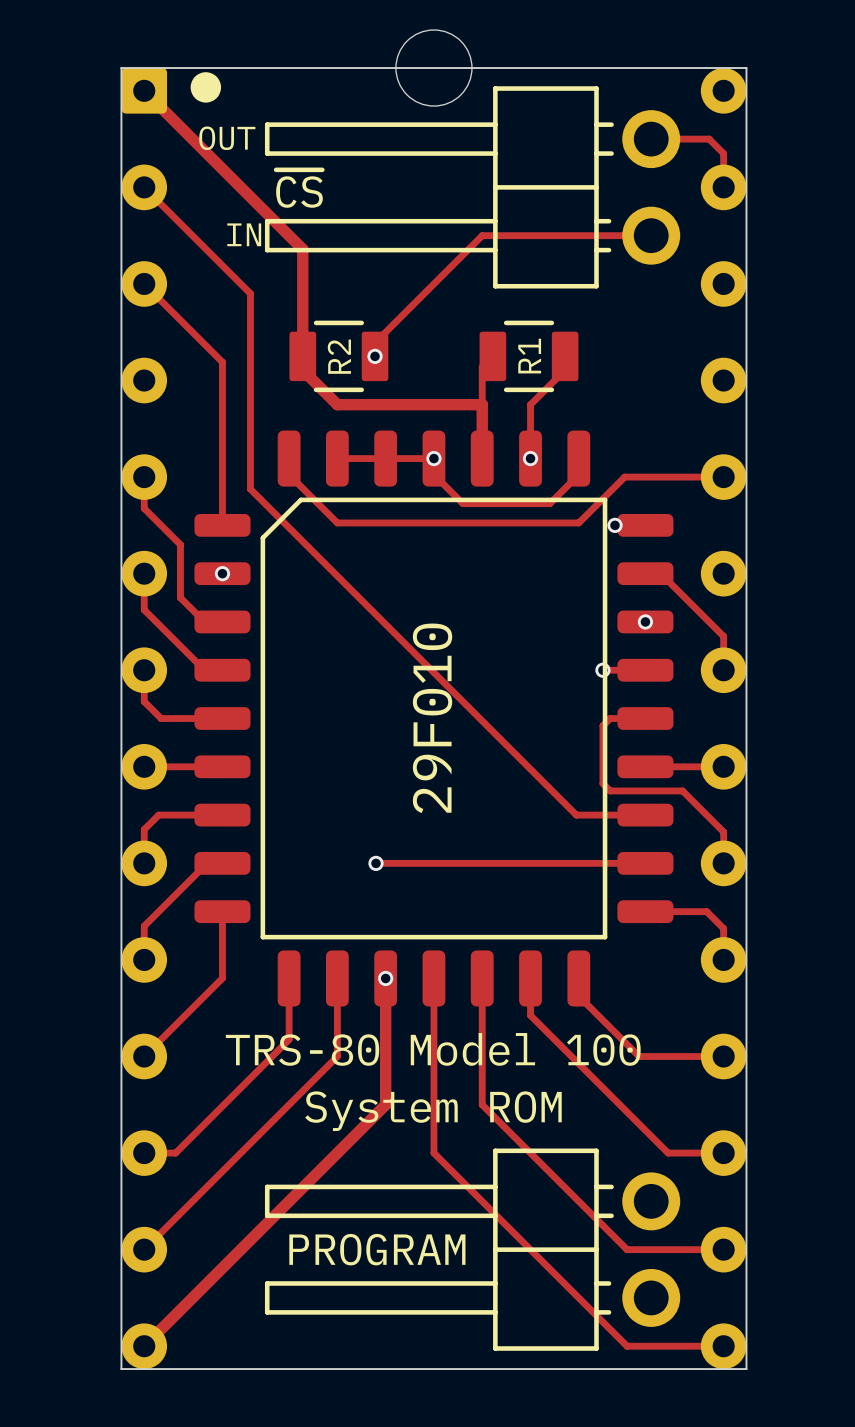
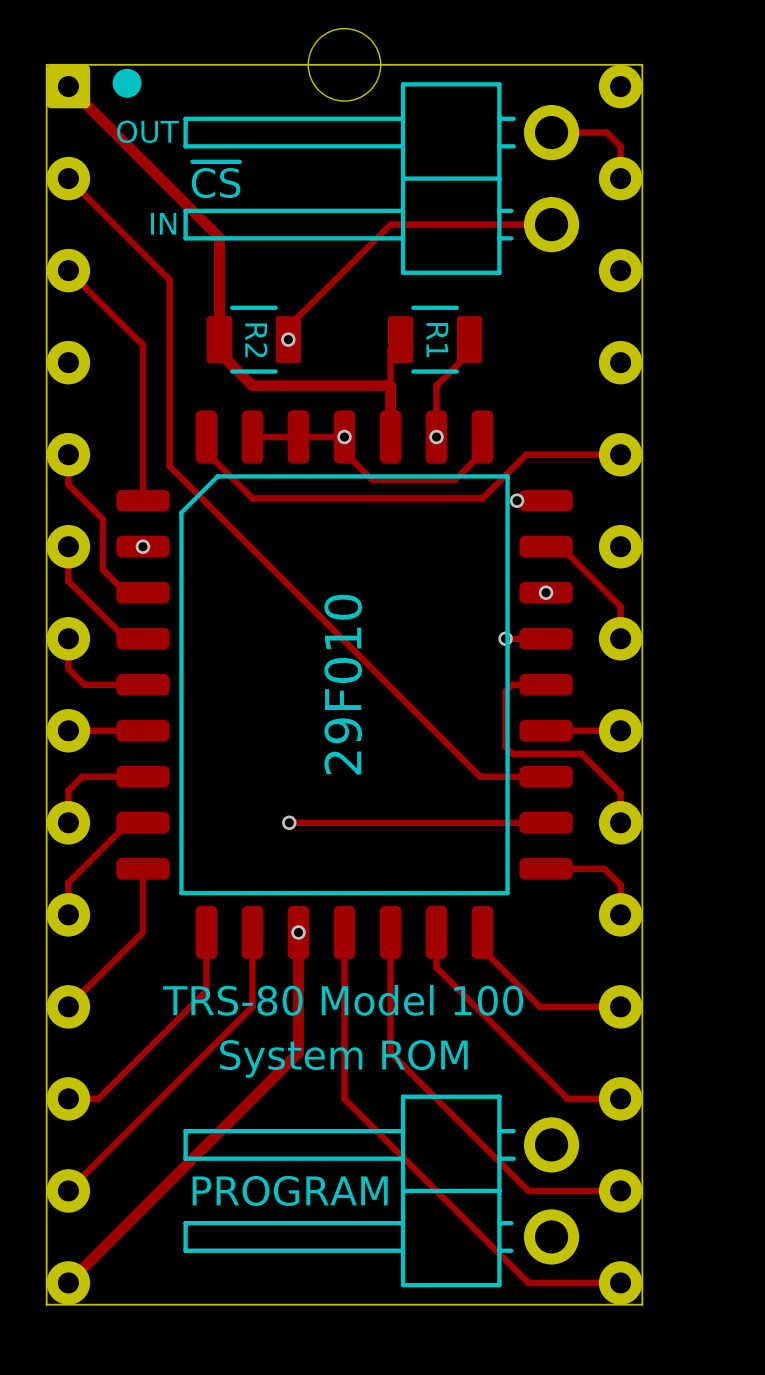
R2 name rotation: 0° (339, 356) -> 180° (256, 340)
R1 name rotation: 0° (529, 356) -> 180° (437, 340)

